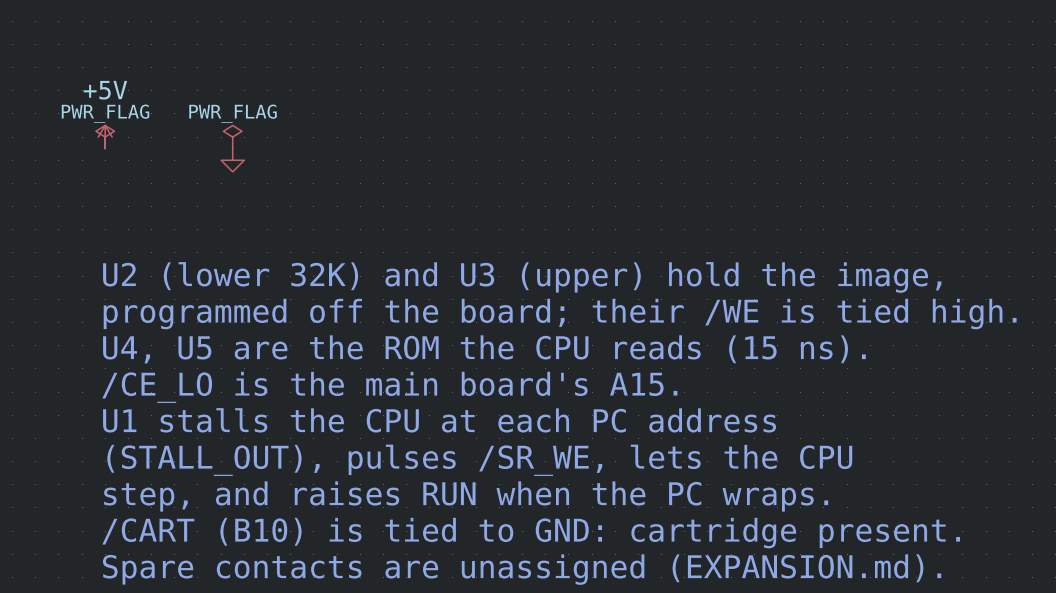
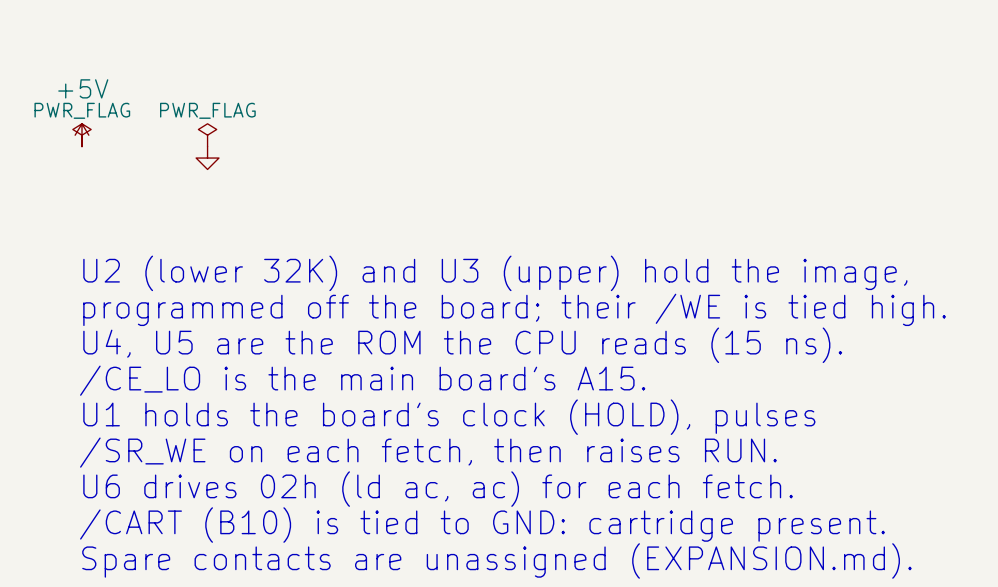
text: U1 stalls the CPU at each PC address (439, 420) -> U1 holds the board's clock (HOLD), pulses (449, 417)
text: (STALL_OUT), pulses /SR_WE, lets the CPU (479, 460) -> /SR_WE on each fetch, then raises RUN. (428, 452)
text: step, and raises RUN when the PC wraps. (466, 496) -> U6 drives 02h (ld ac, ac) for each fetch. (438, 489)

